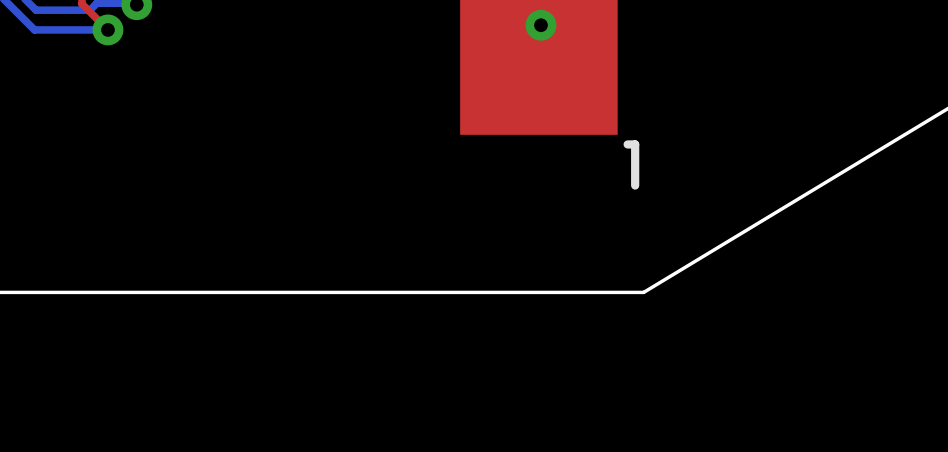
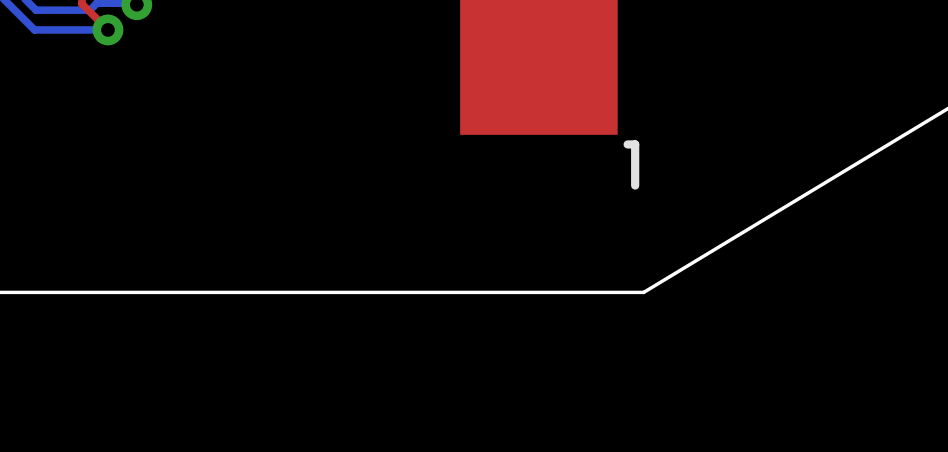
via: (540, 25) -> none

